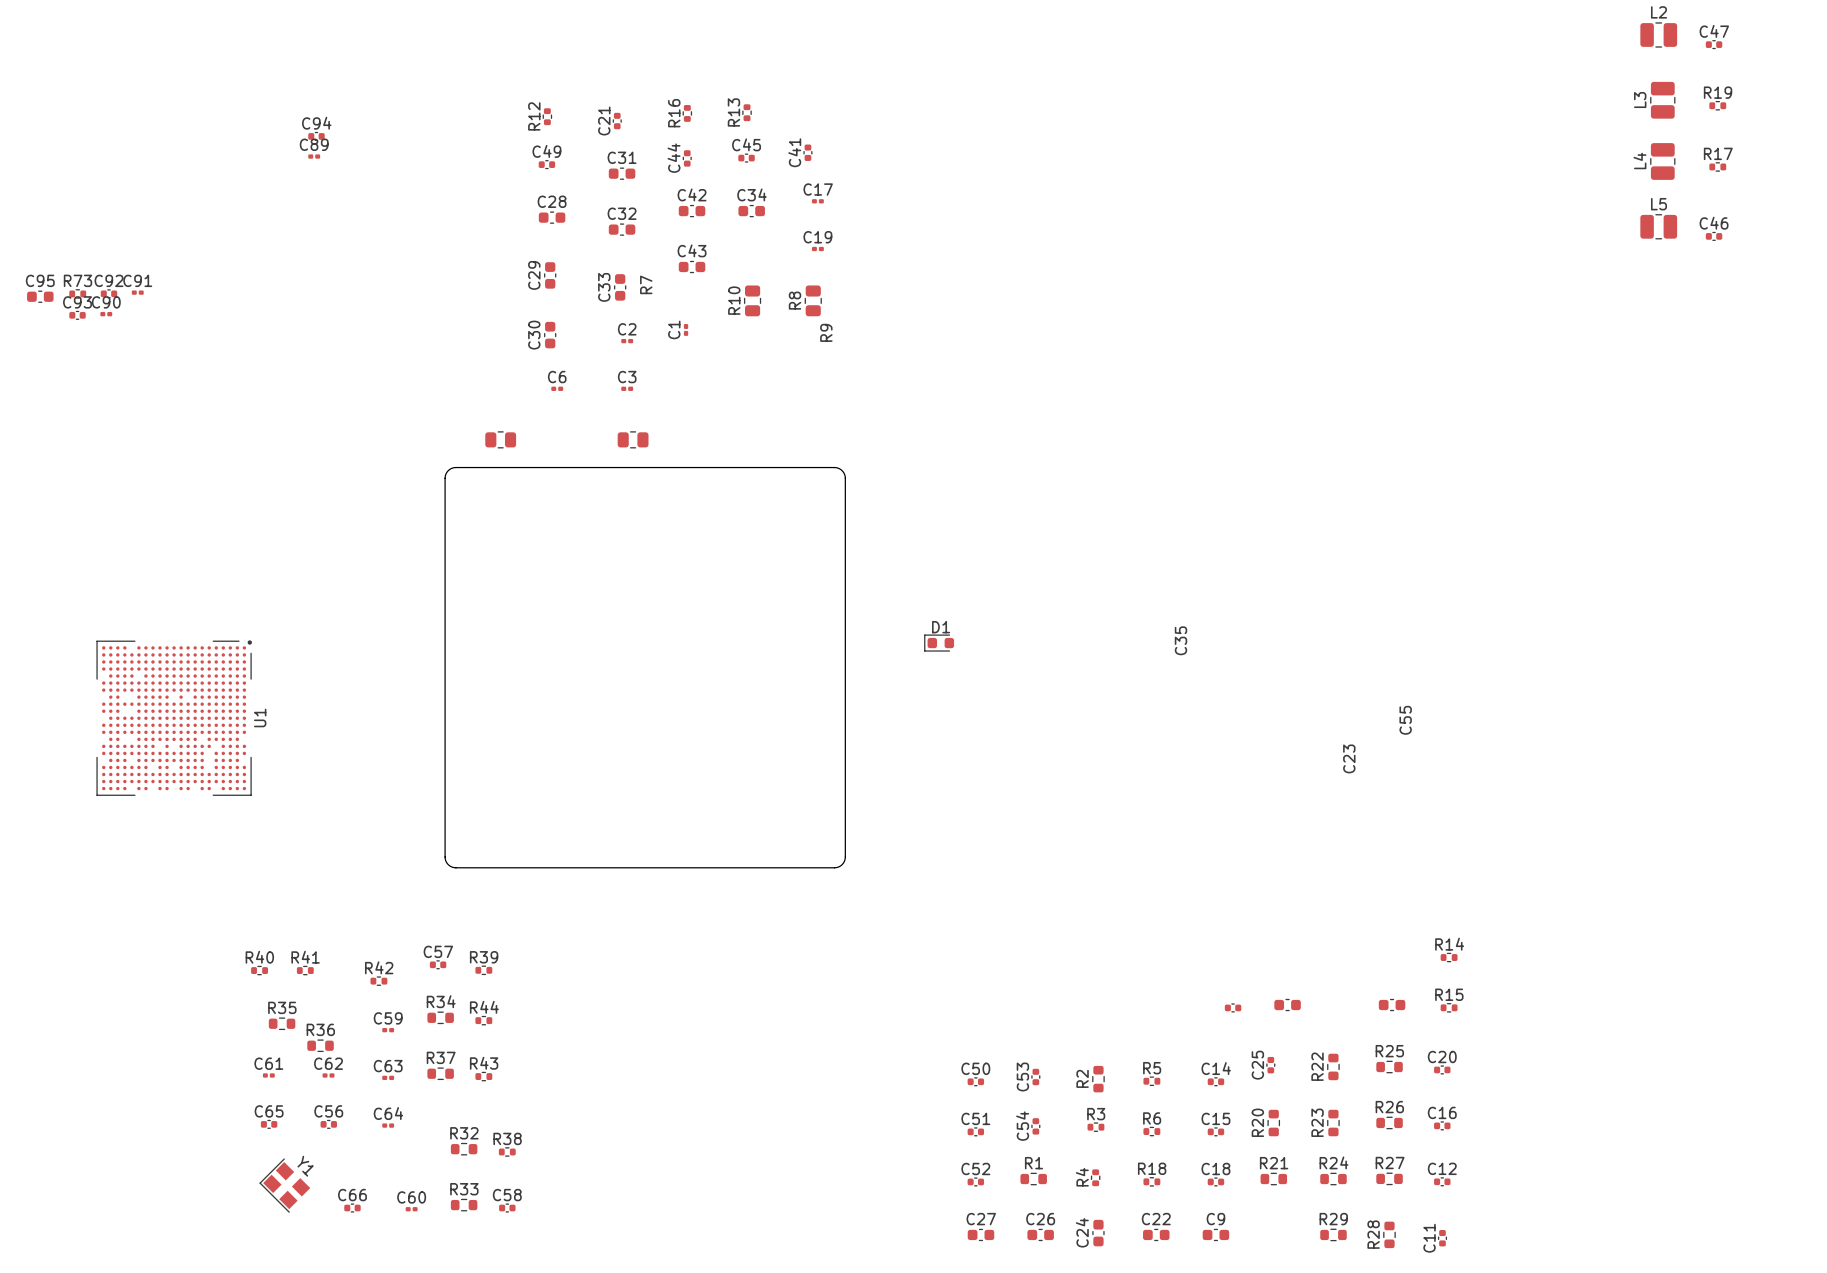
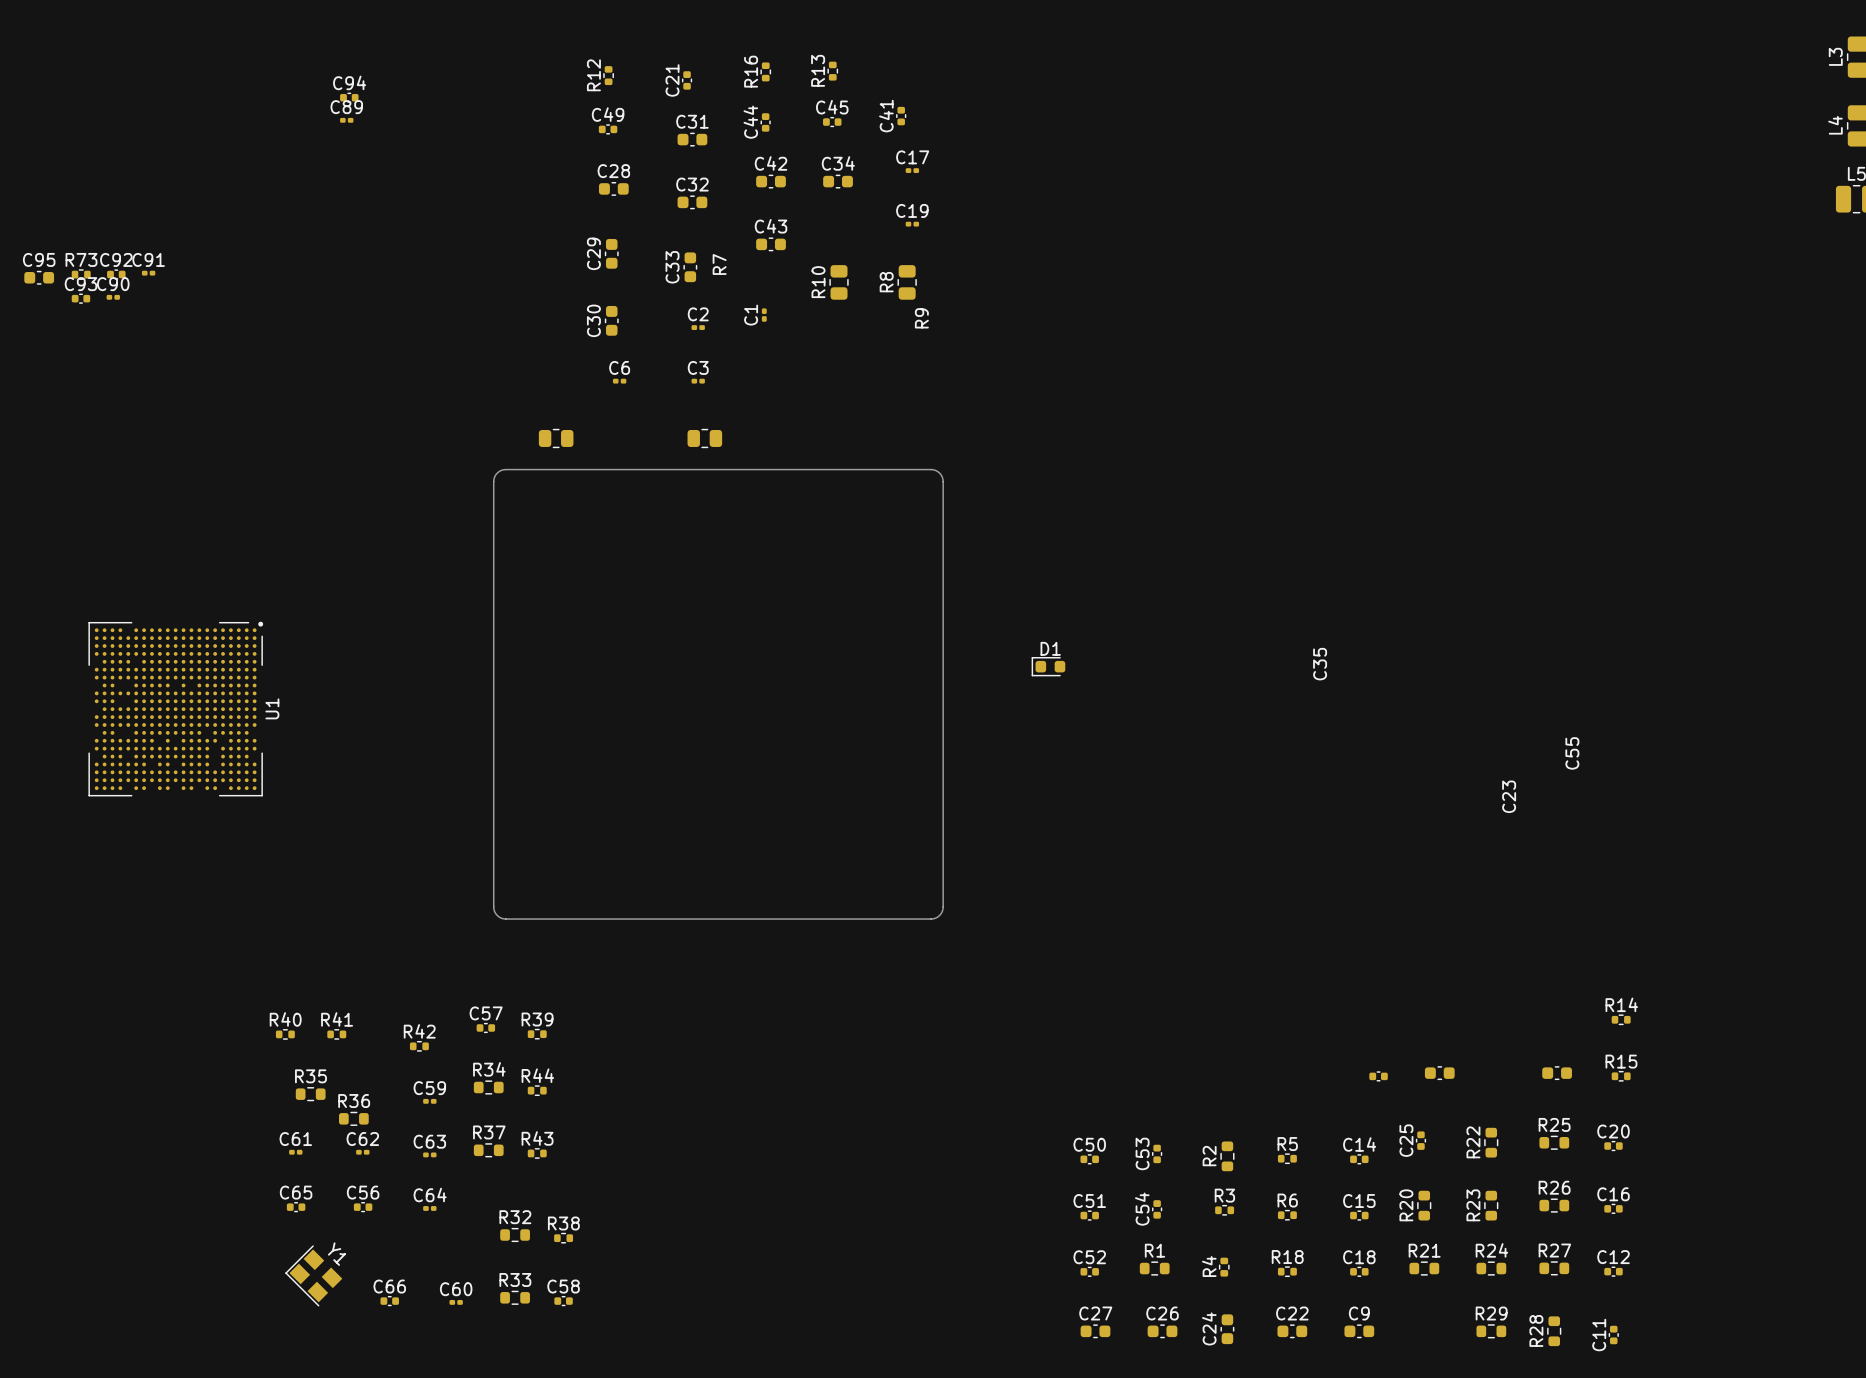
U1 position: (174, 718) -> (175, 709)

